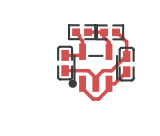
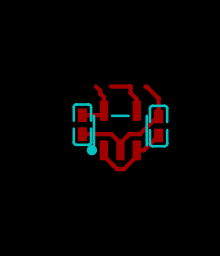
part: (82, 32) -> none
part: (110, 32) -> none

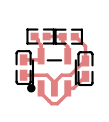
part: none -> (40, 36)
part: none -> (68, 36)

